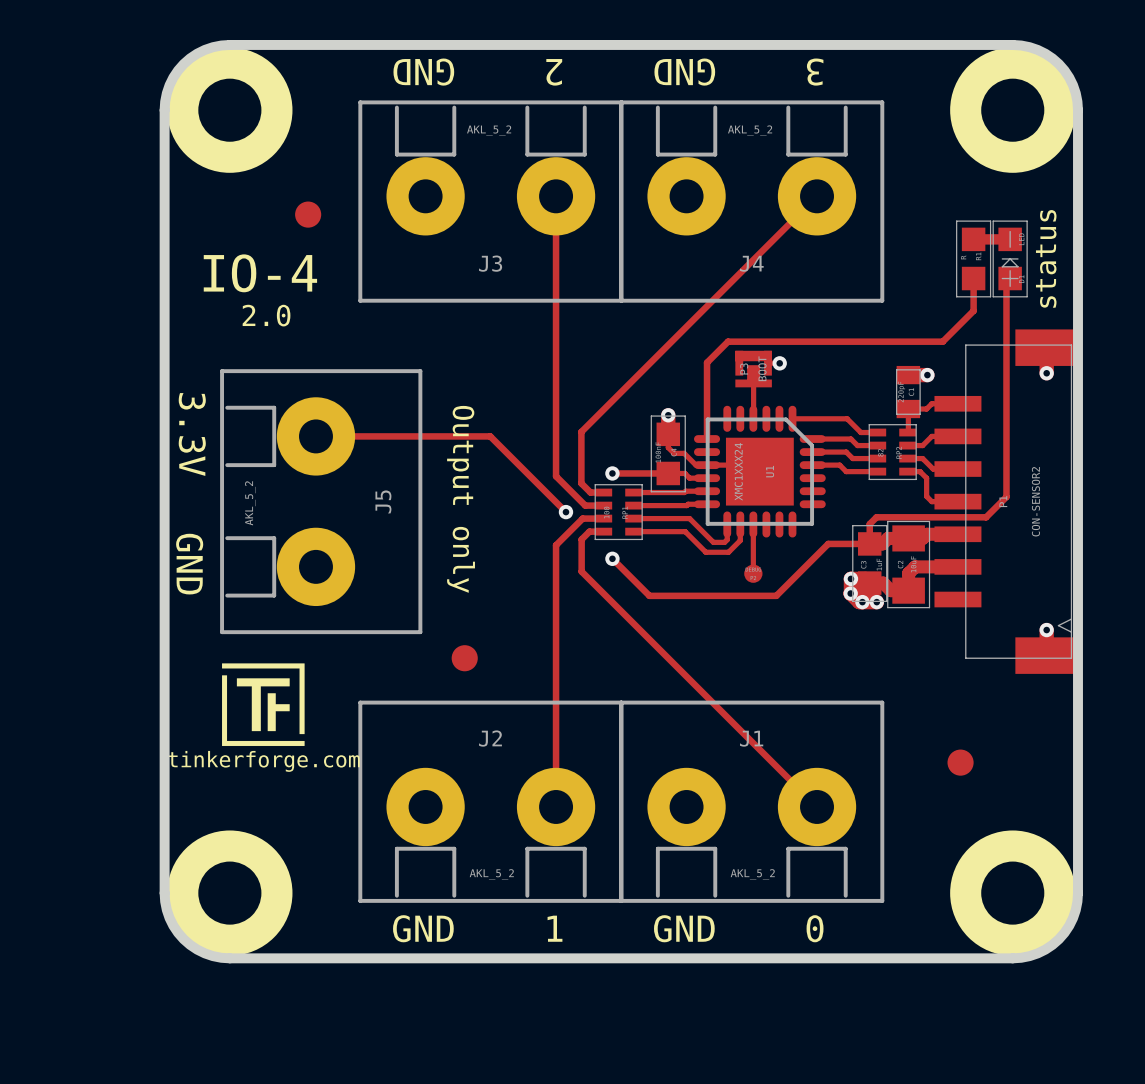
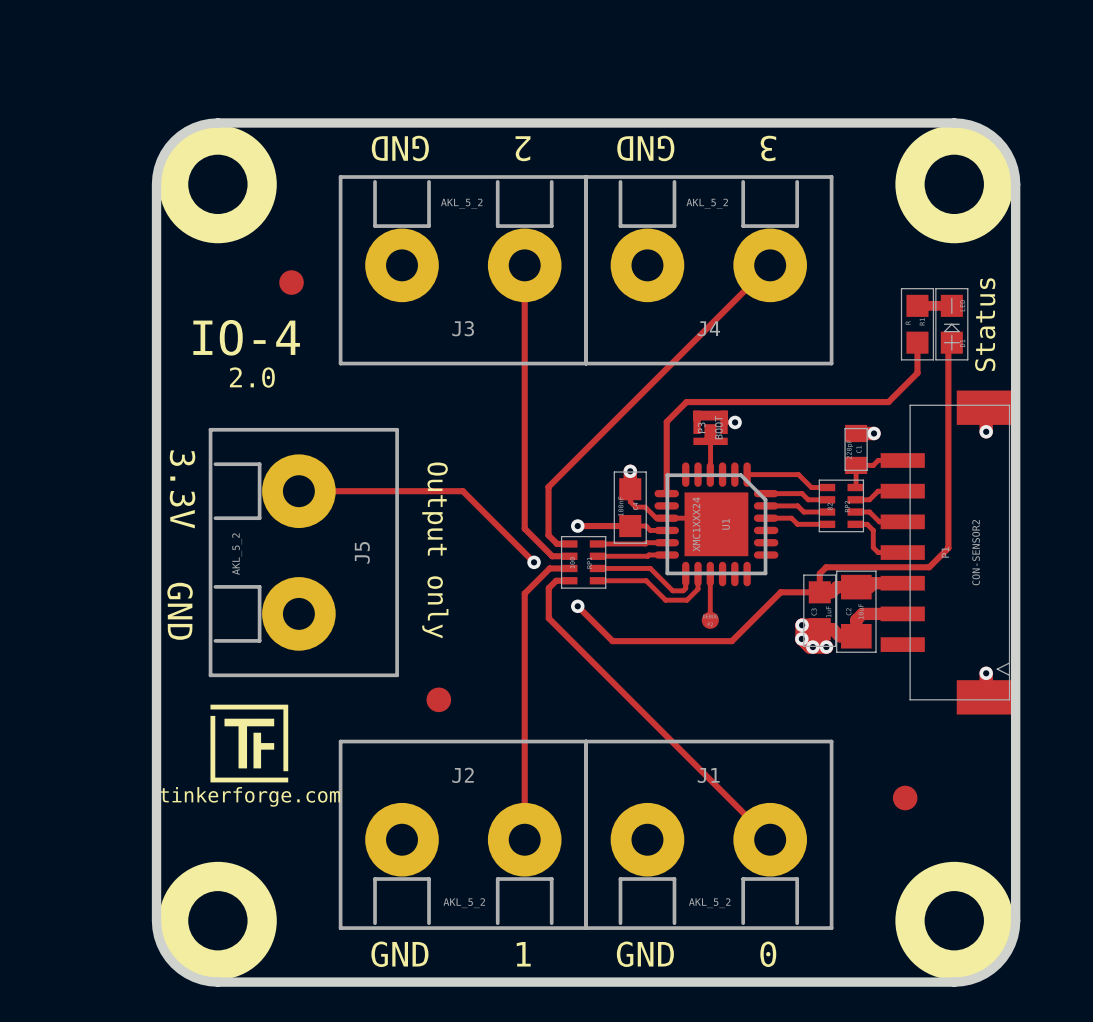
text: status (1046, 258) -> Status (985, 324)

